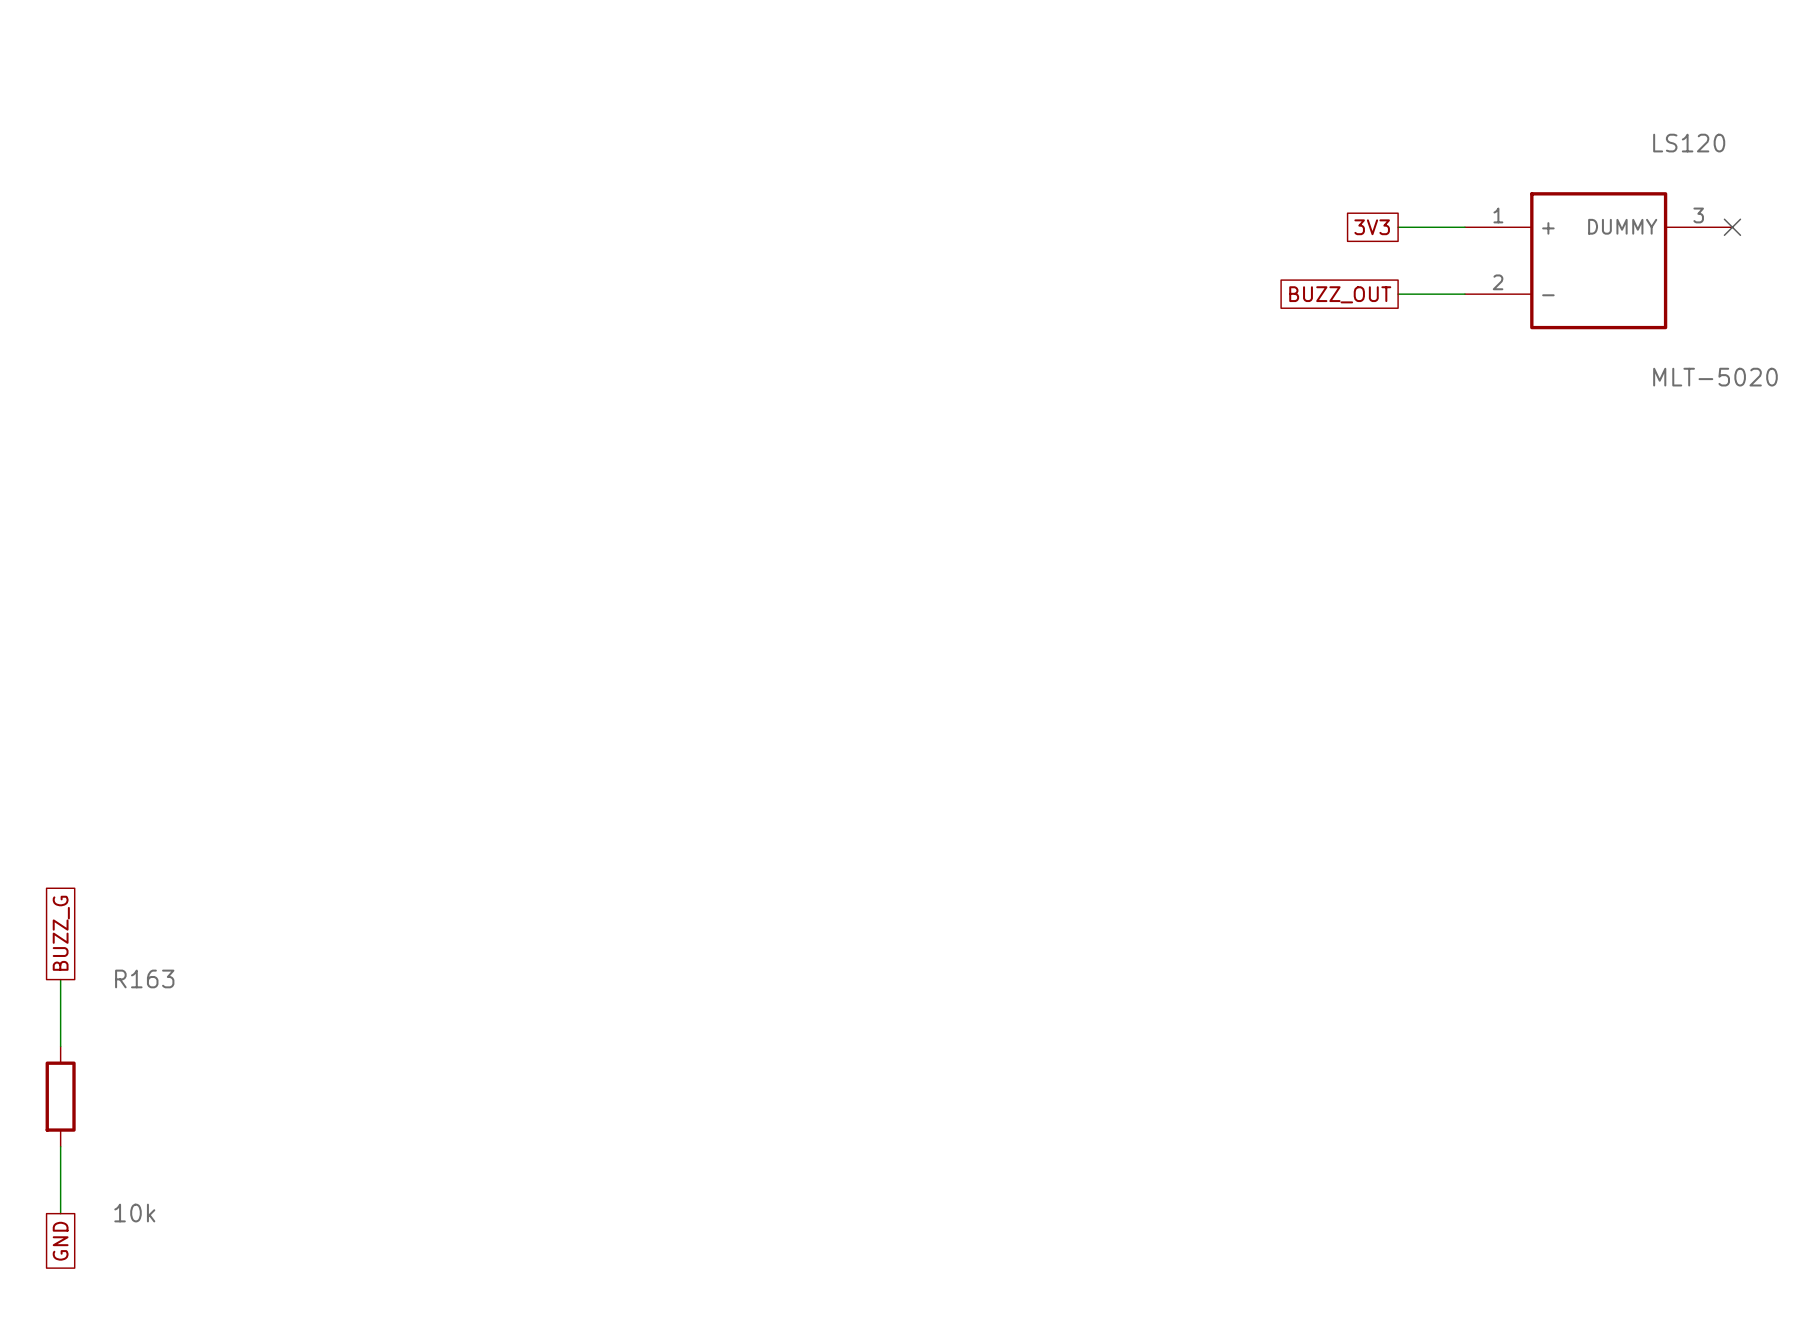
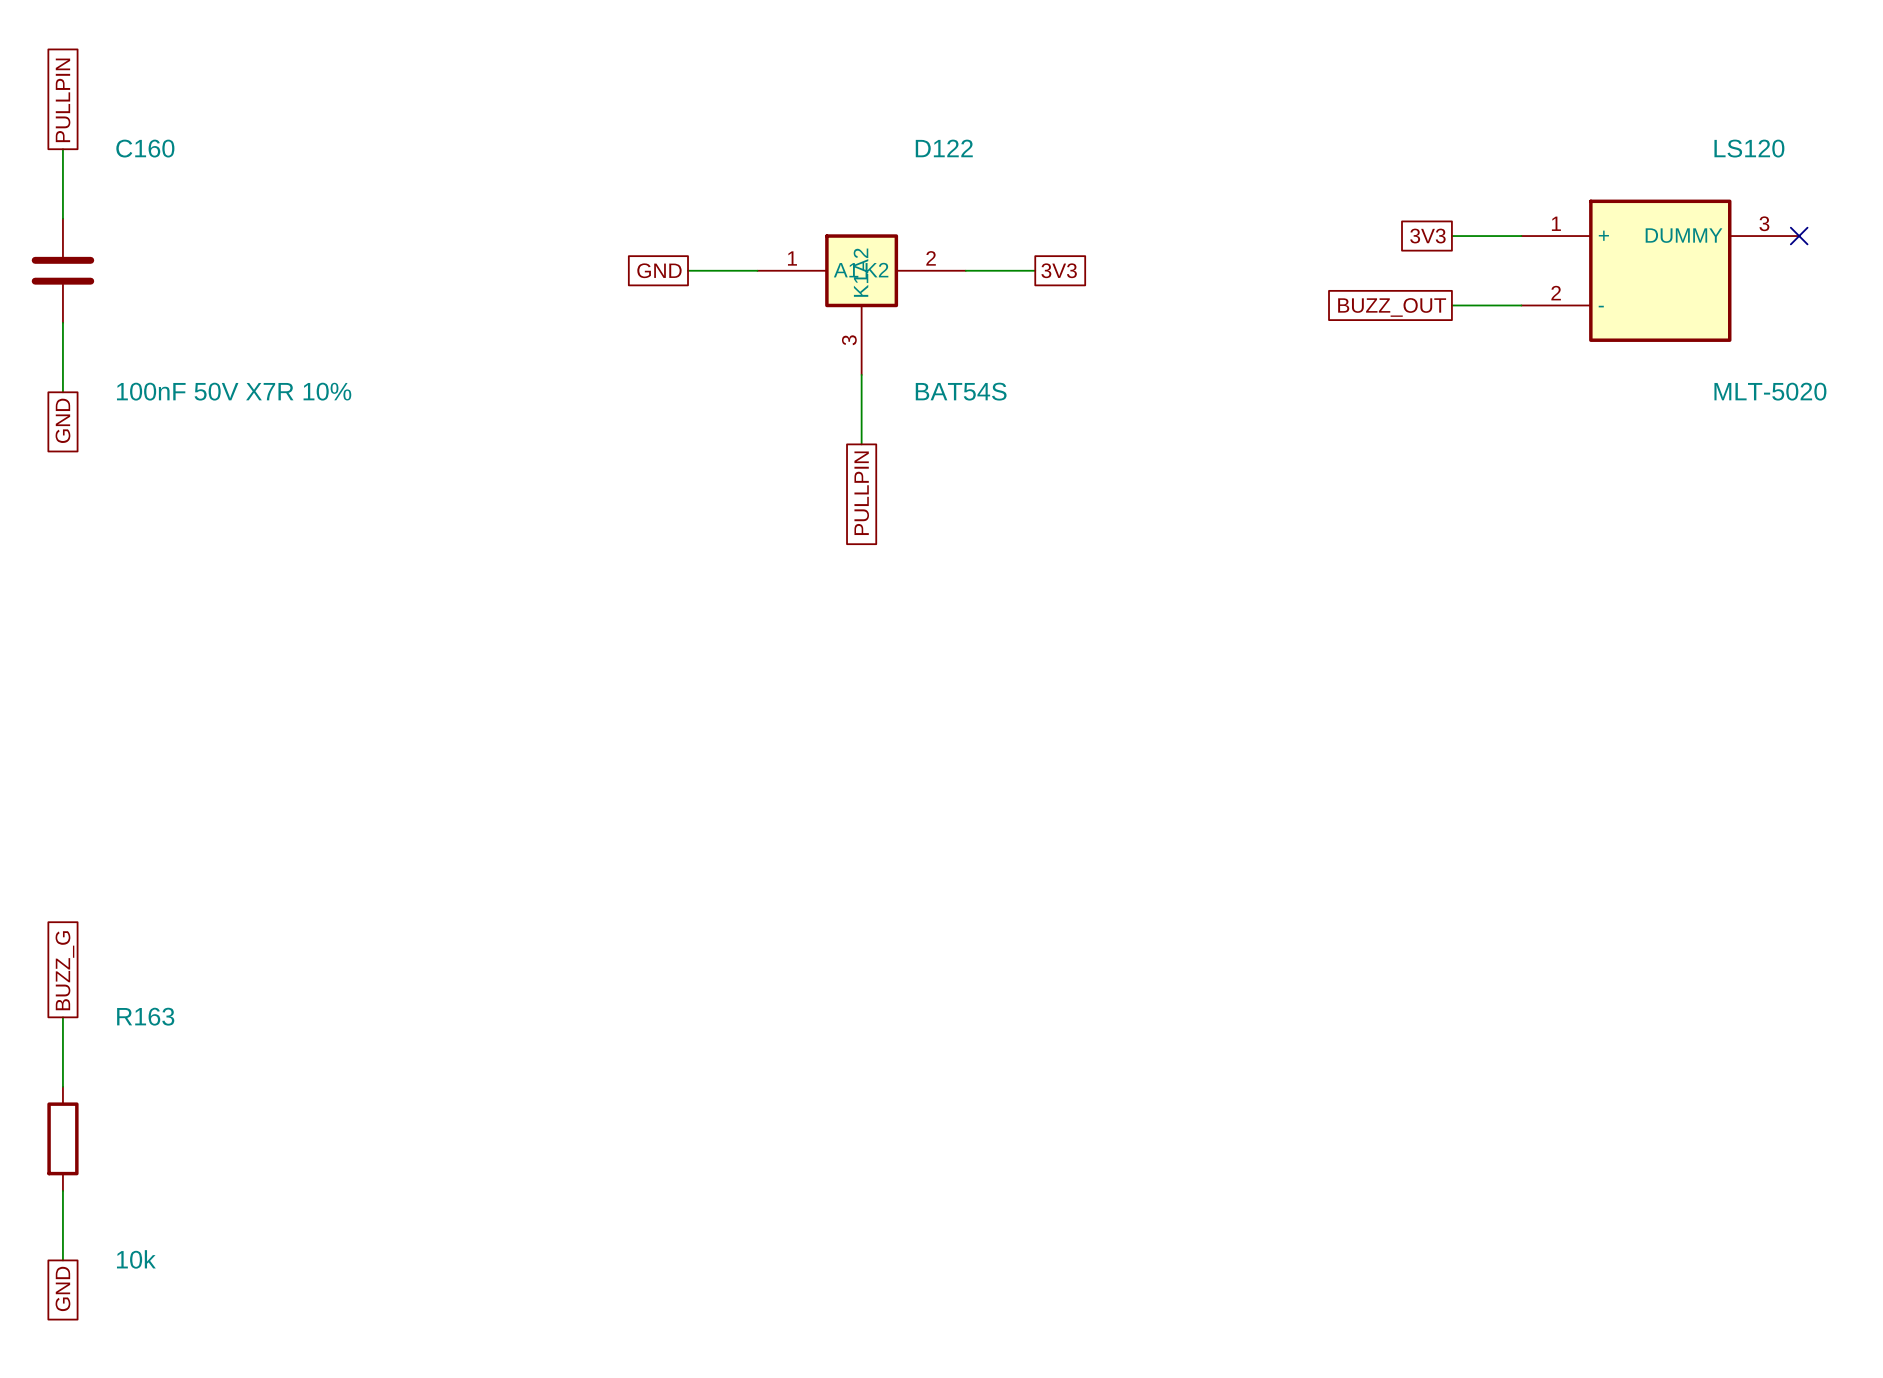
global label: none -> PULLPIN (63, 100)
wire: none -> (62, 149) (62, 218)
C160: none -> 100nF 50V X7R 10% (62, 270)
global label: none -> GND (659, 270)
wire: none -> (688, 270) (757, 270)
wire: none -> (965, 270) (1035, 270)
global label: none -> 3V3 (1059, 270)
D122: none -> BAT54S (861, 304)
wire: none -> (62, 322) (62, 392)
wire: none -> (861, 374) (861, 444)
global label: none -> GND (62, 420)
global label: none -> PULLPIN (861, 493)

